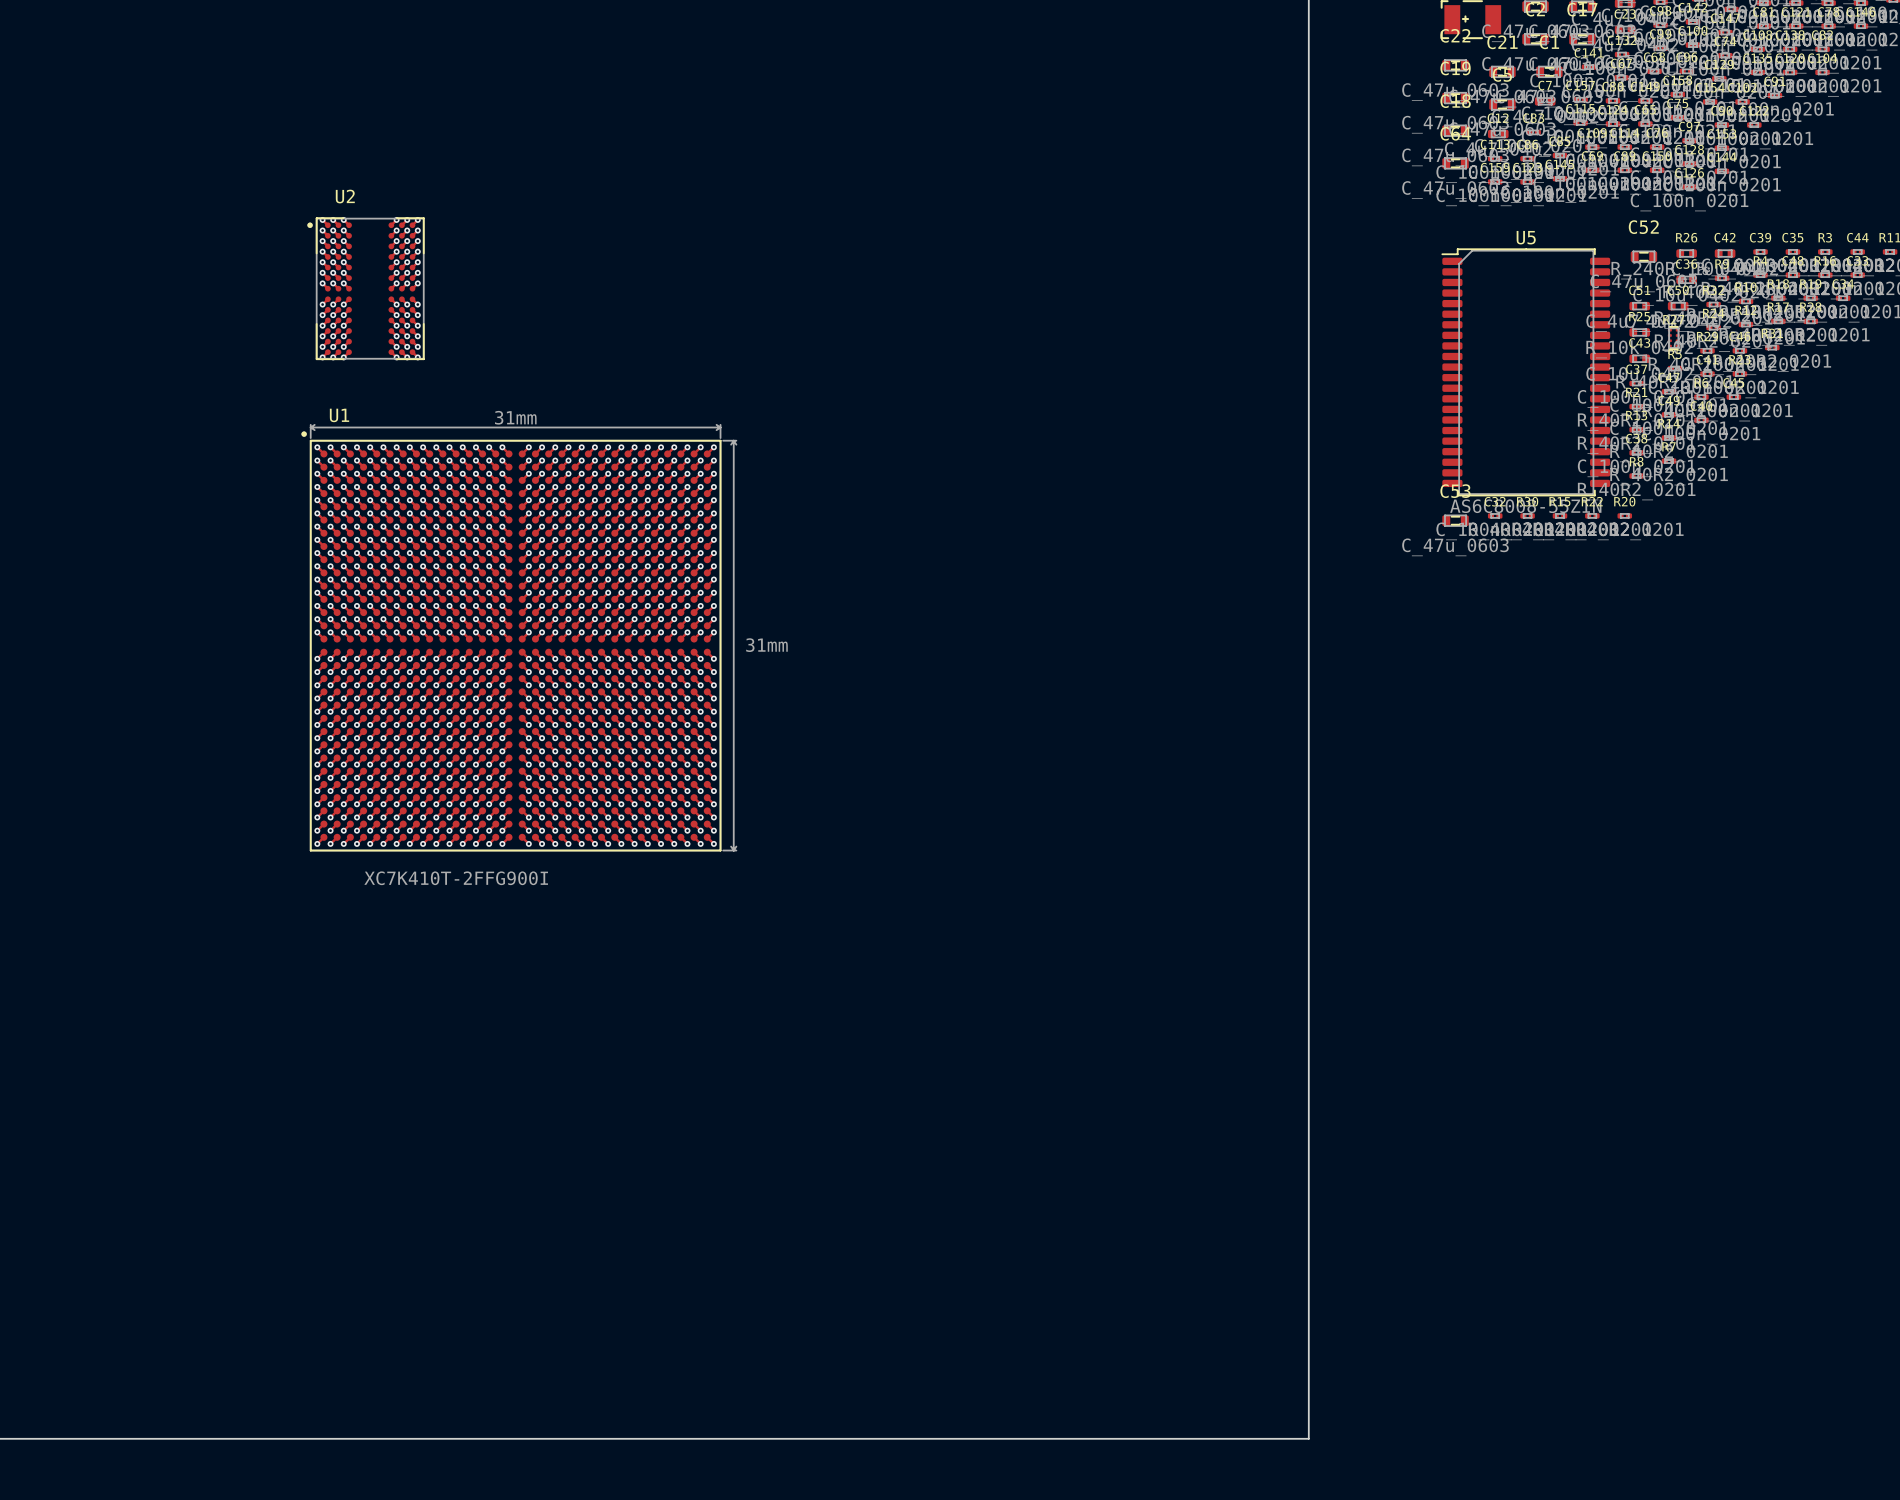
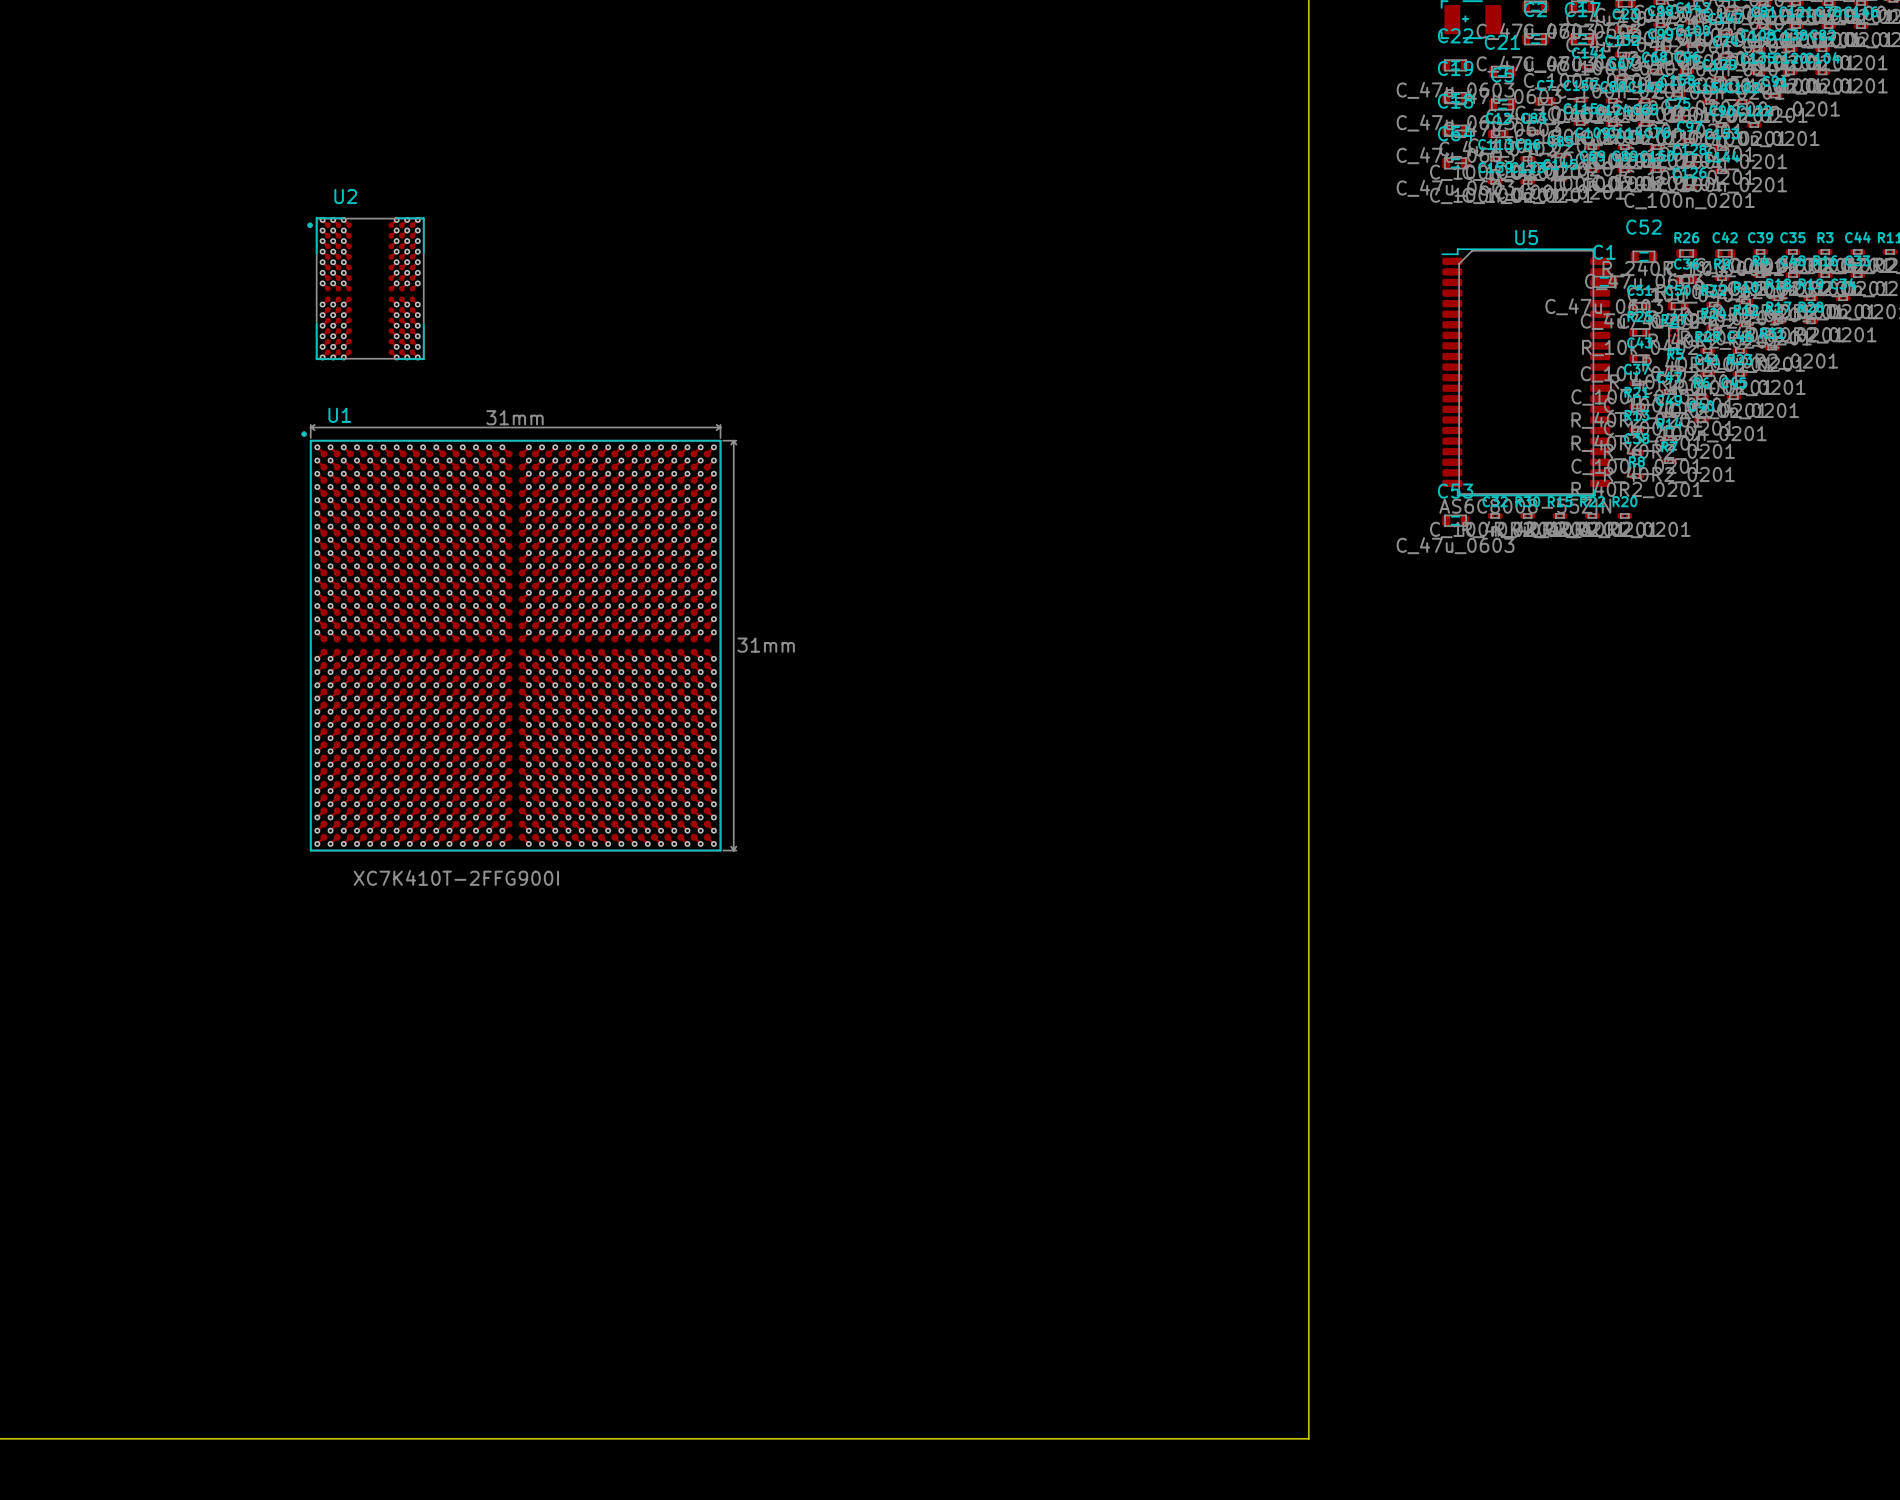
C1 position: (1549, 71) -> (1604, 281)

